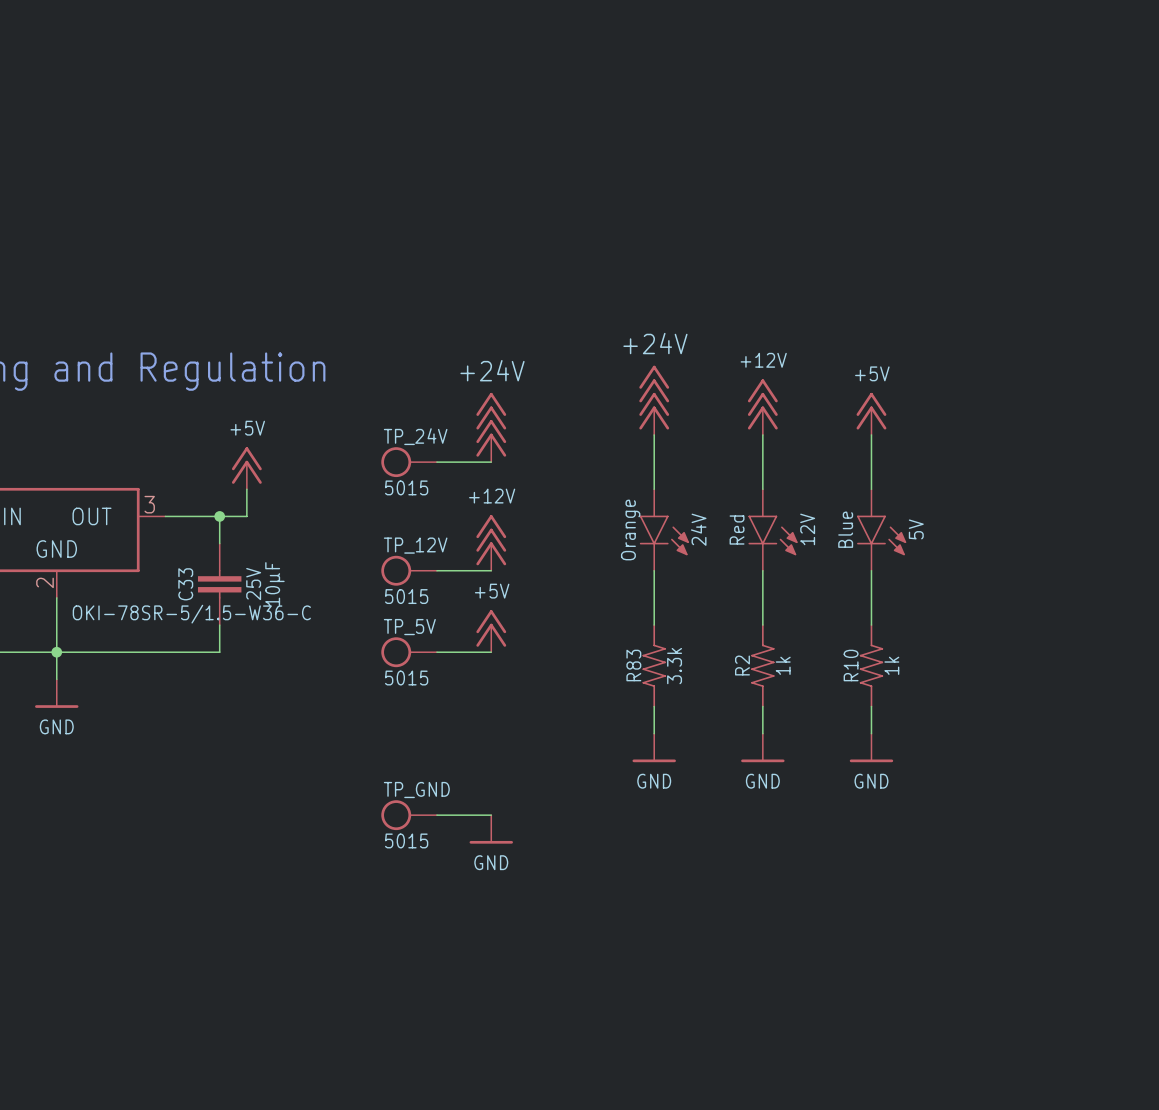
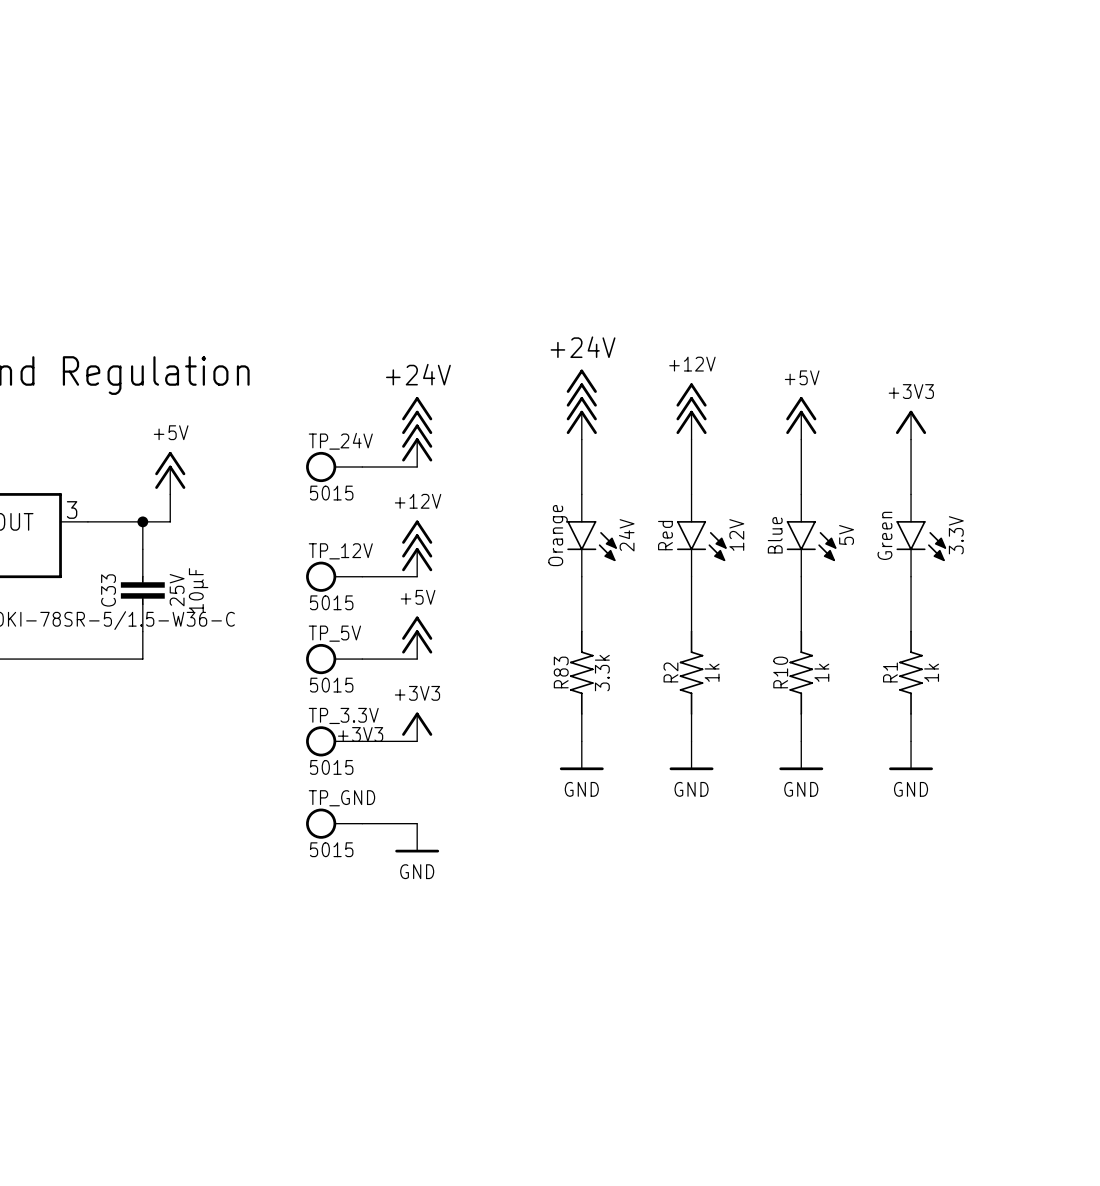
power symbol: none -> +3V3 (911, 425)
wire: none -> (911, 439) (911, 494)
3.3V: none -> (921, 535)
wire: none -> (911, 576) (911, 631)
R1: none -> (911, 672)
wire: none -> (911, 713) (911, 741)
power symbol: none -> +3V3 (417, 726)
TP_3.3V: none -> (334, 741)
wire: none -> (362, 741) (417, 741)
power symbol: none -> GND (911, 755)

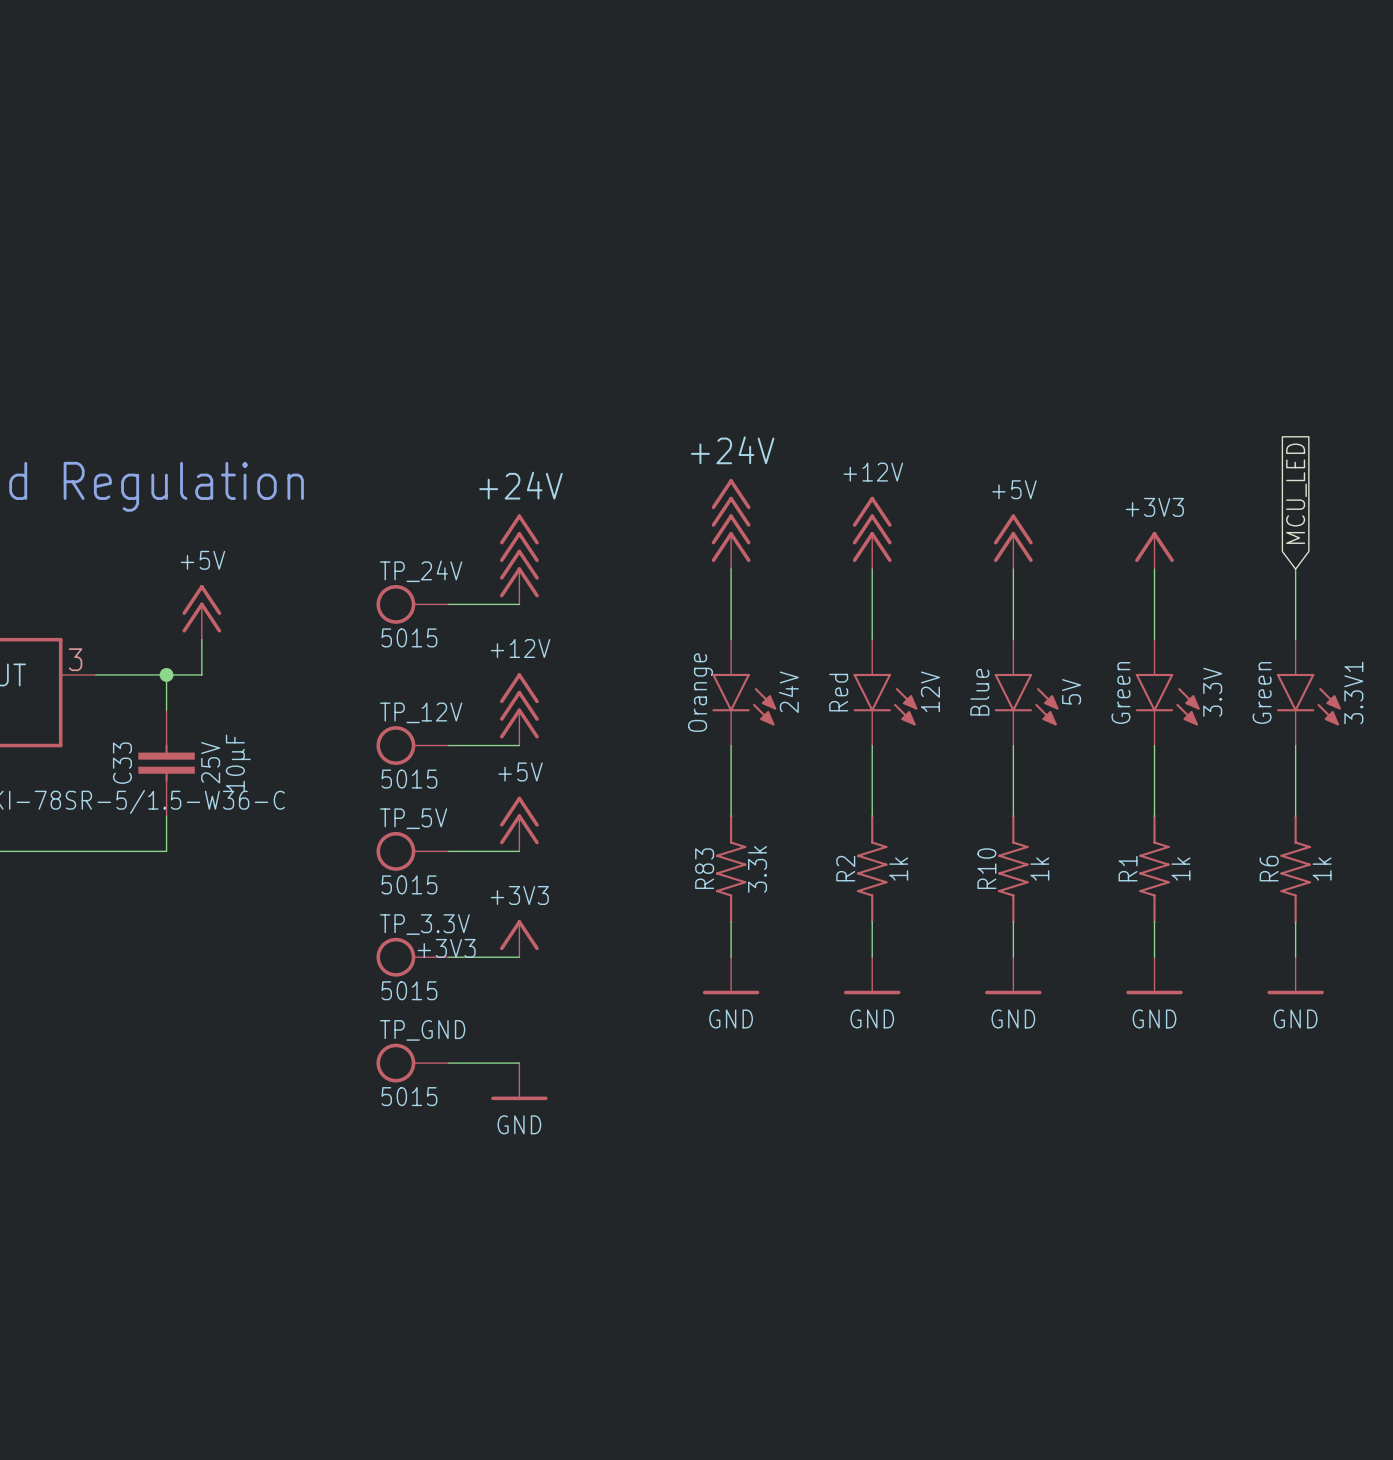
global label: none -> MCU_LED (1296, 493)
wire: none -> (1295, 569) (1295, 639)
3.3V1: none -> (1308, 692)
wire: none -> (1295, 745) (1295, 816)
R6: none -> (1295, 869)
wire: none -> (1295, 921) (1295, 957)
power symbol: none -> GND (1295, 975)

